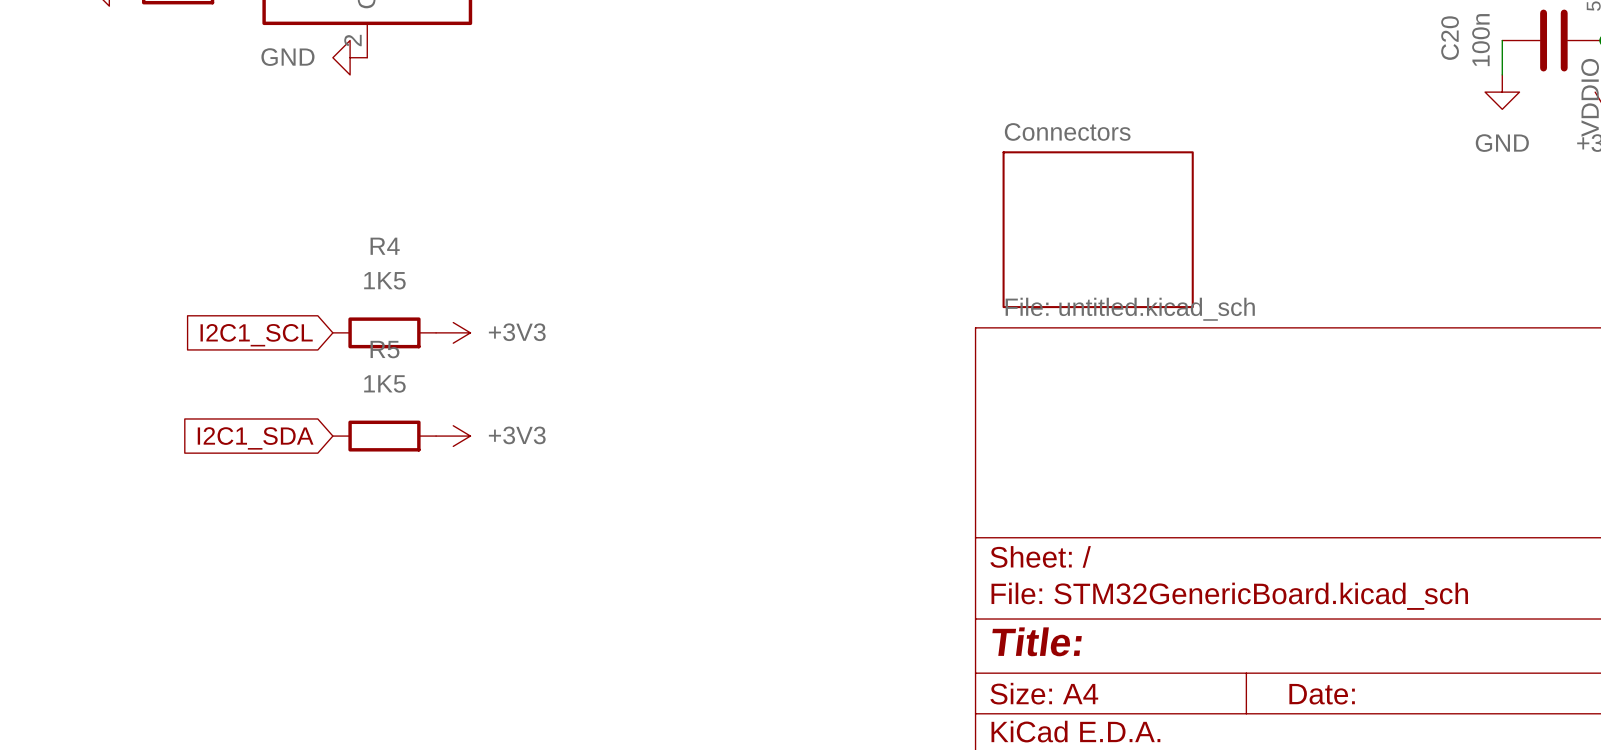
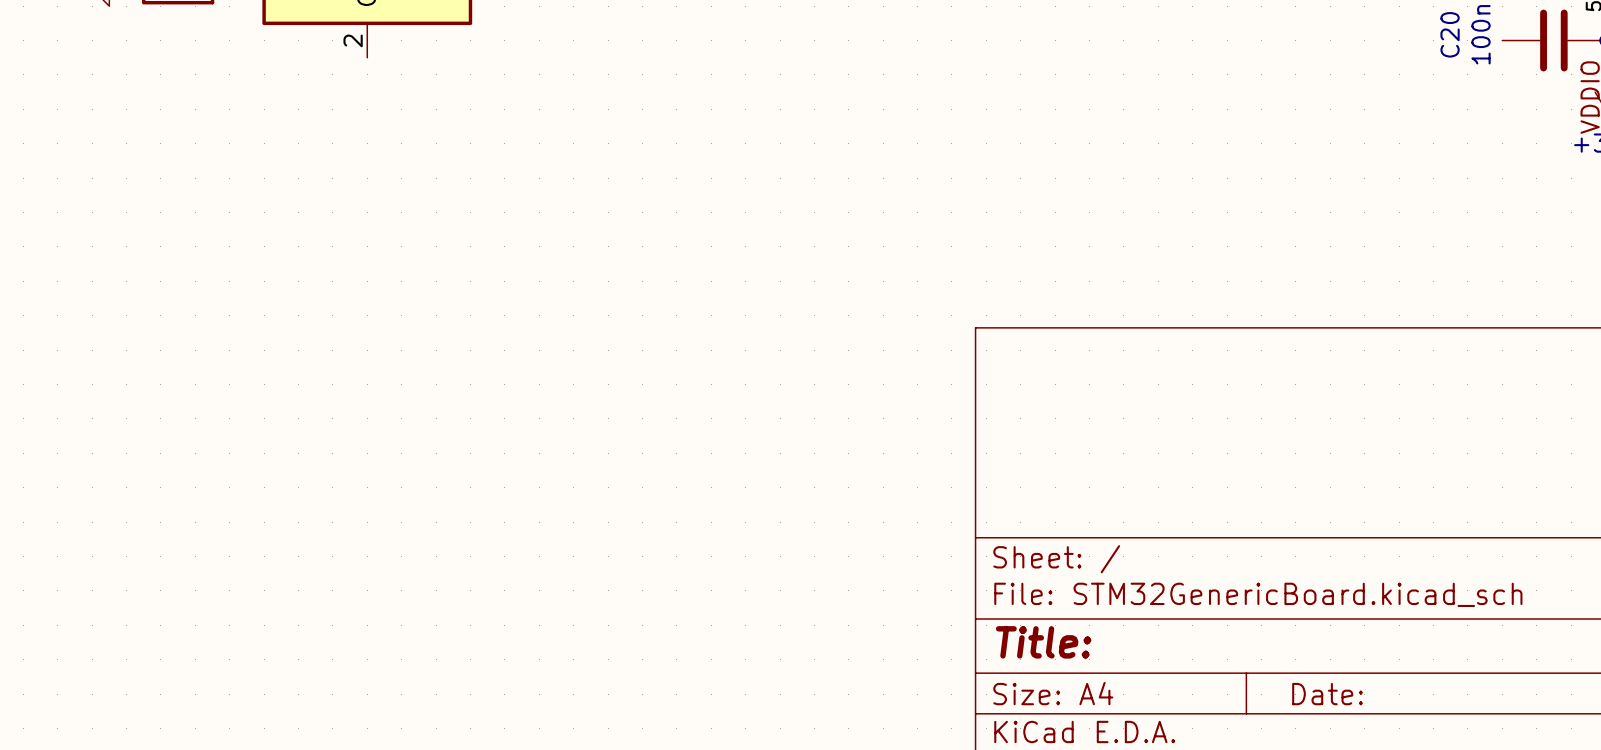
wire: (1502, 40) (1502, 74) -> none
power symbol: GND (350, 57) -> none
power symbol: GND (1502, 92) -> none
sheet Connectors: File: untitled.kicad_sch (1098, 229) -> none
R4: 1K5 (384, 332) -> none
power symbol: +3V3 (453, 332) -> none
global label: I2C1_SCL (256, 335) -> none
R5: 1K5 (384, 436) -> none
power symbol: +3V3 (453, 436) -> none
global label: I2C1_SDA (255, 438) -> none

